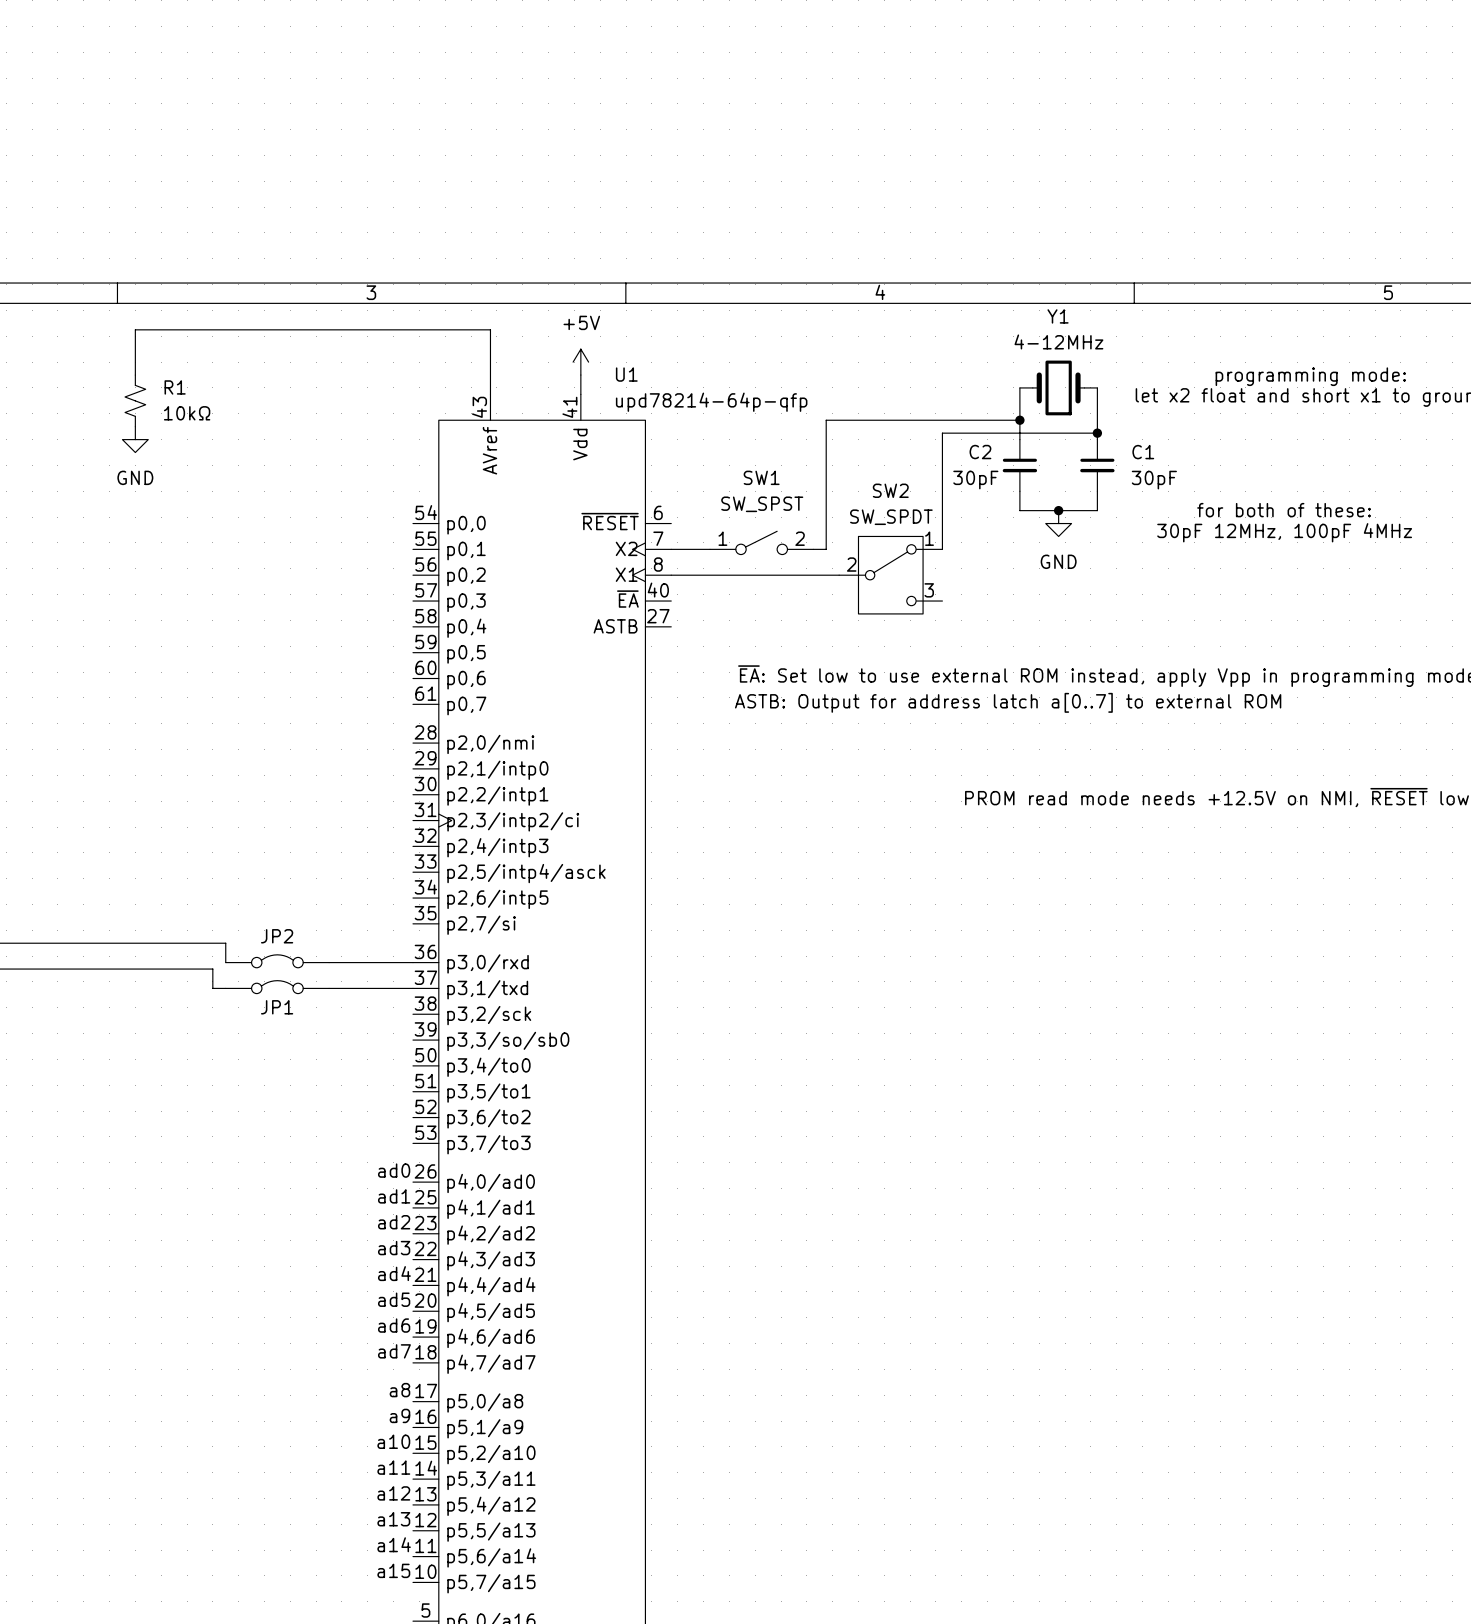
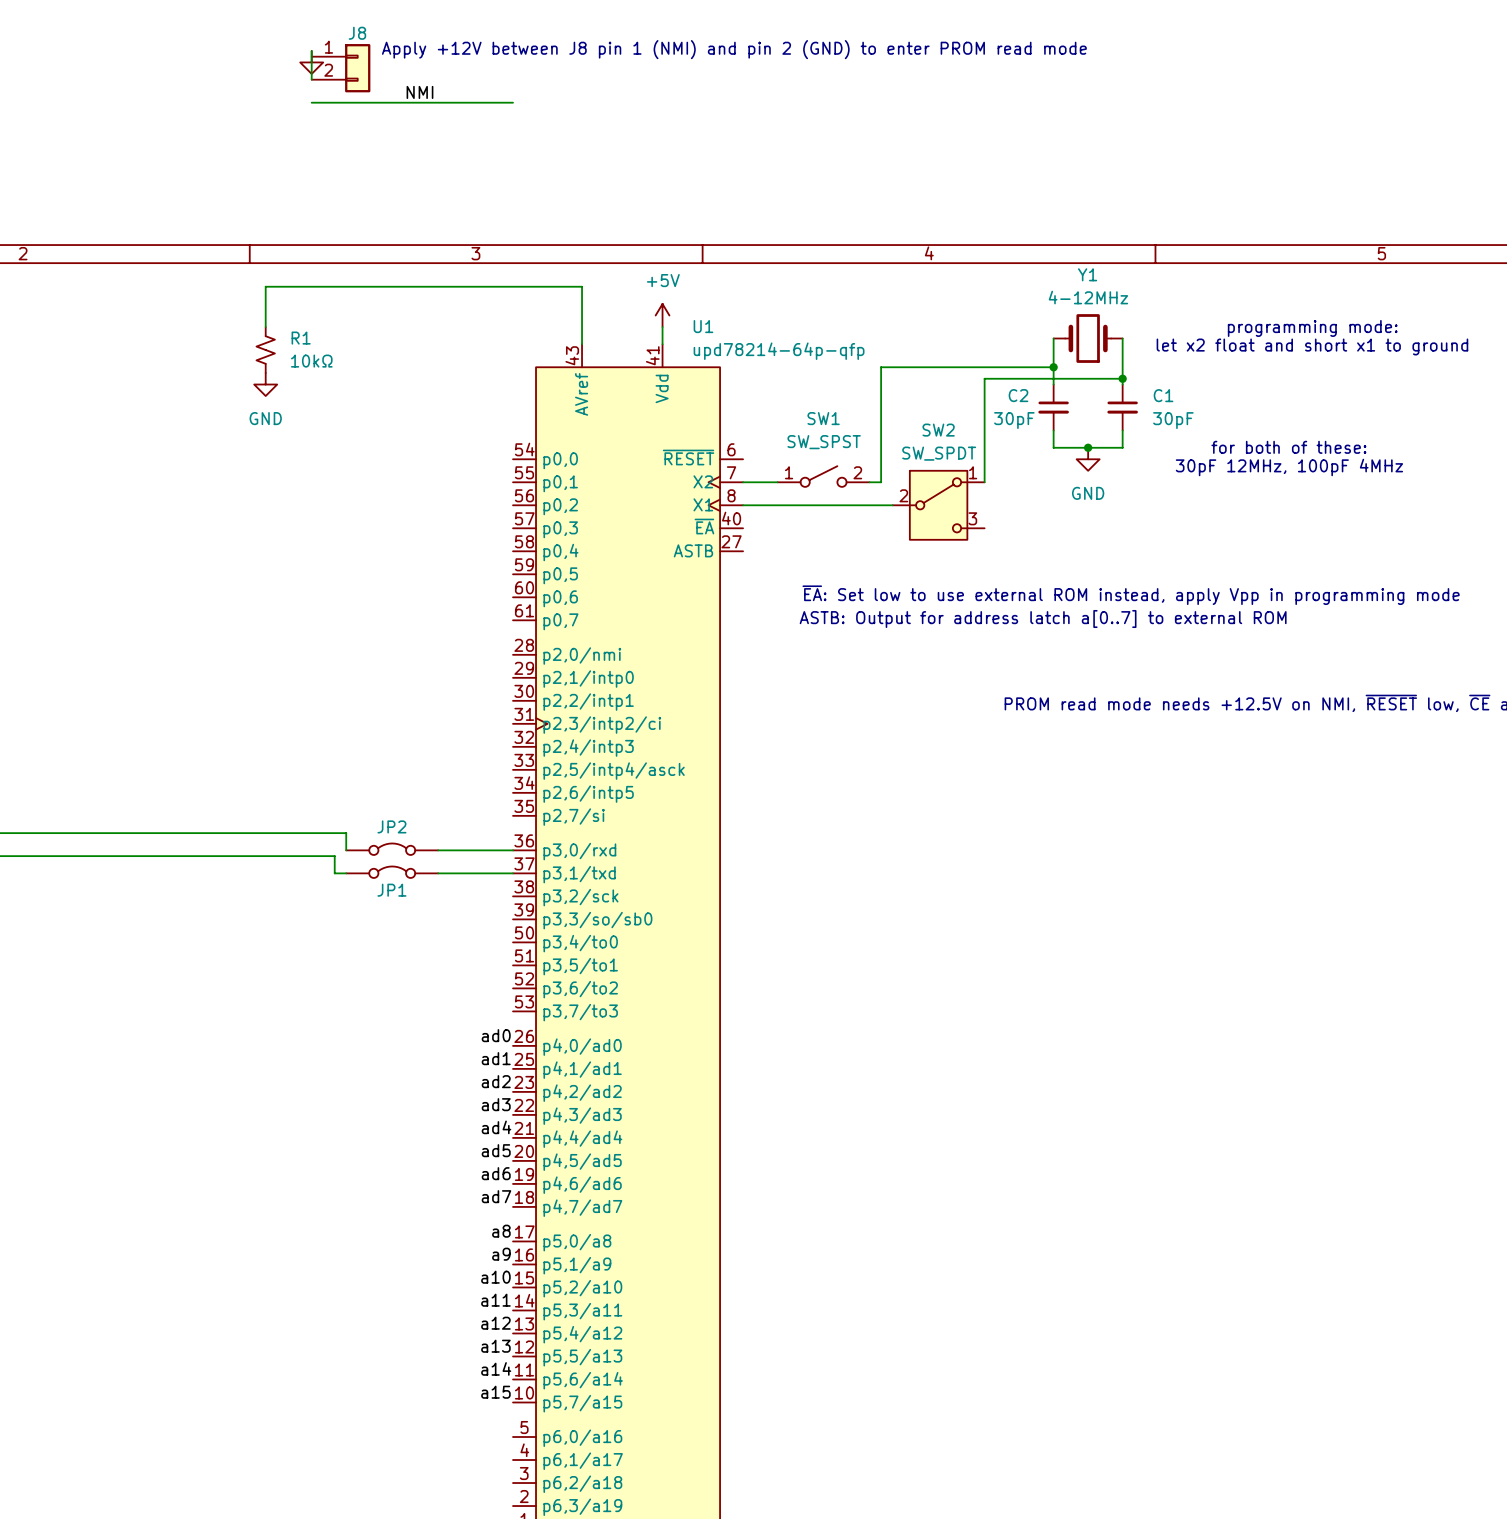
text: none -> Apply +12V between J8 pin 1 (NMI) and pin 2 (GND) to enter PROM read mode (734, 49)
wire: none -> (311, 50) (311, 79)
power symbol: none -> (311, 62)
J8: none -> (341, 68)
label: none -> NMI (419, 92)
wire: none -> (311, 102) (513, 102)

